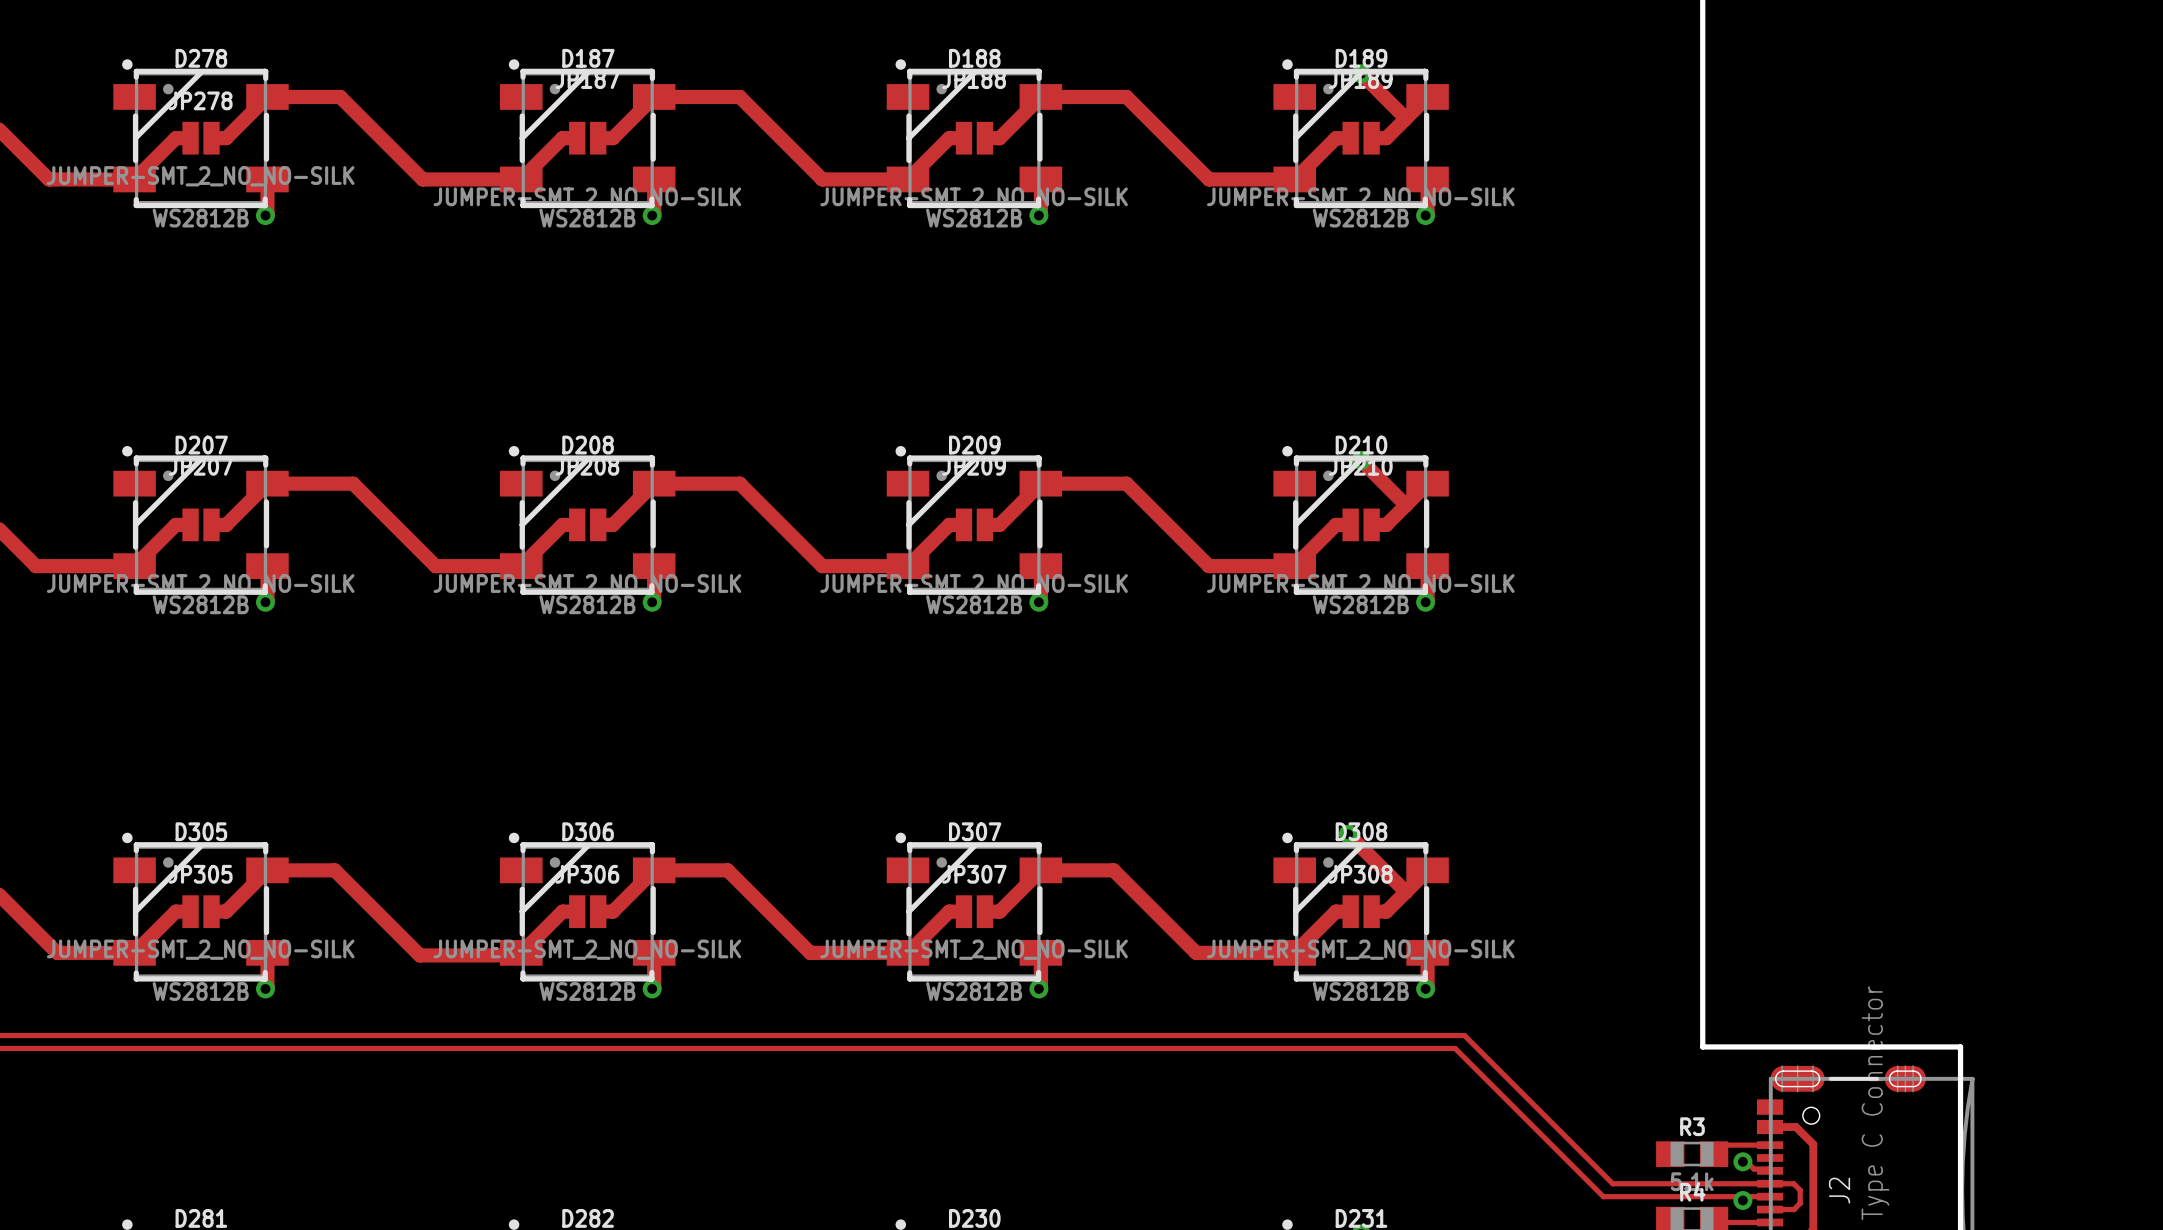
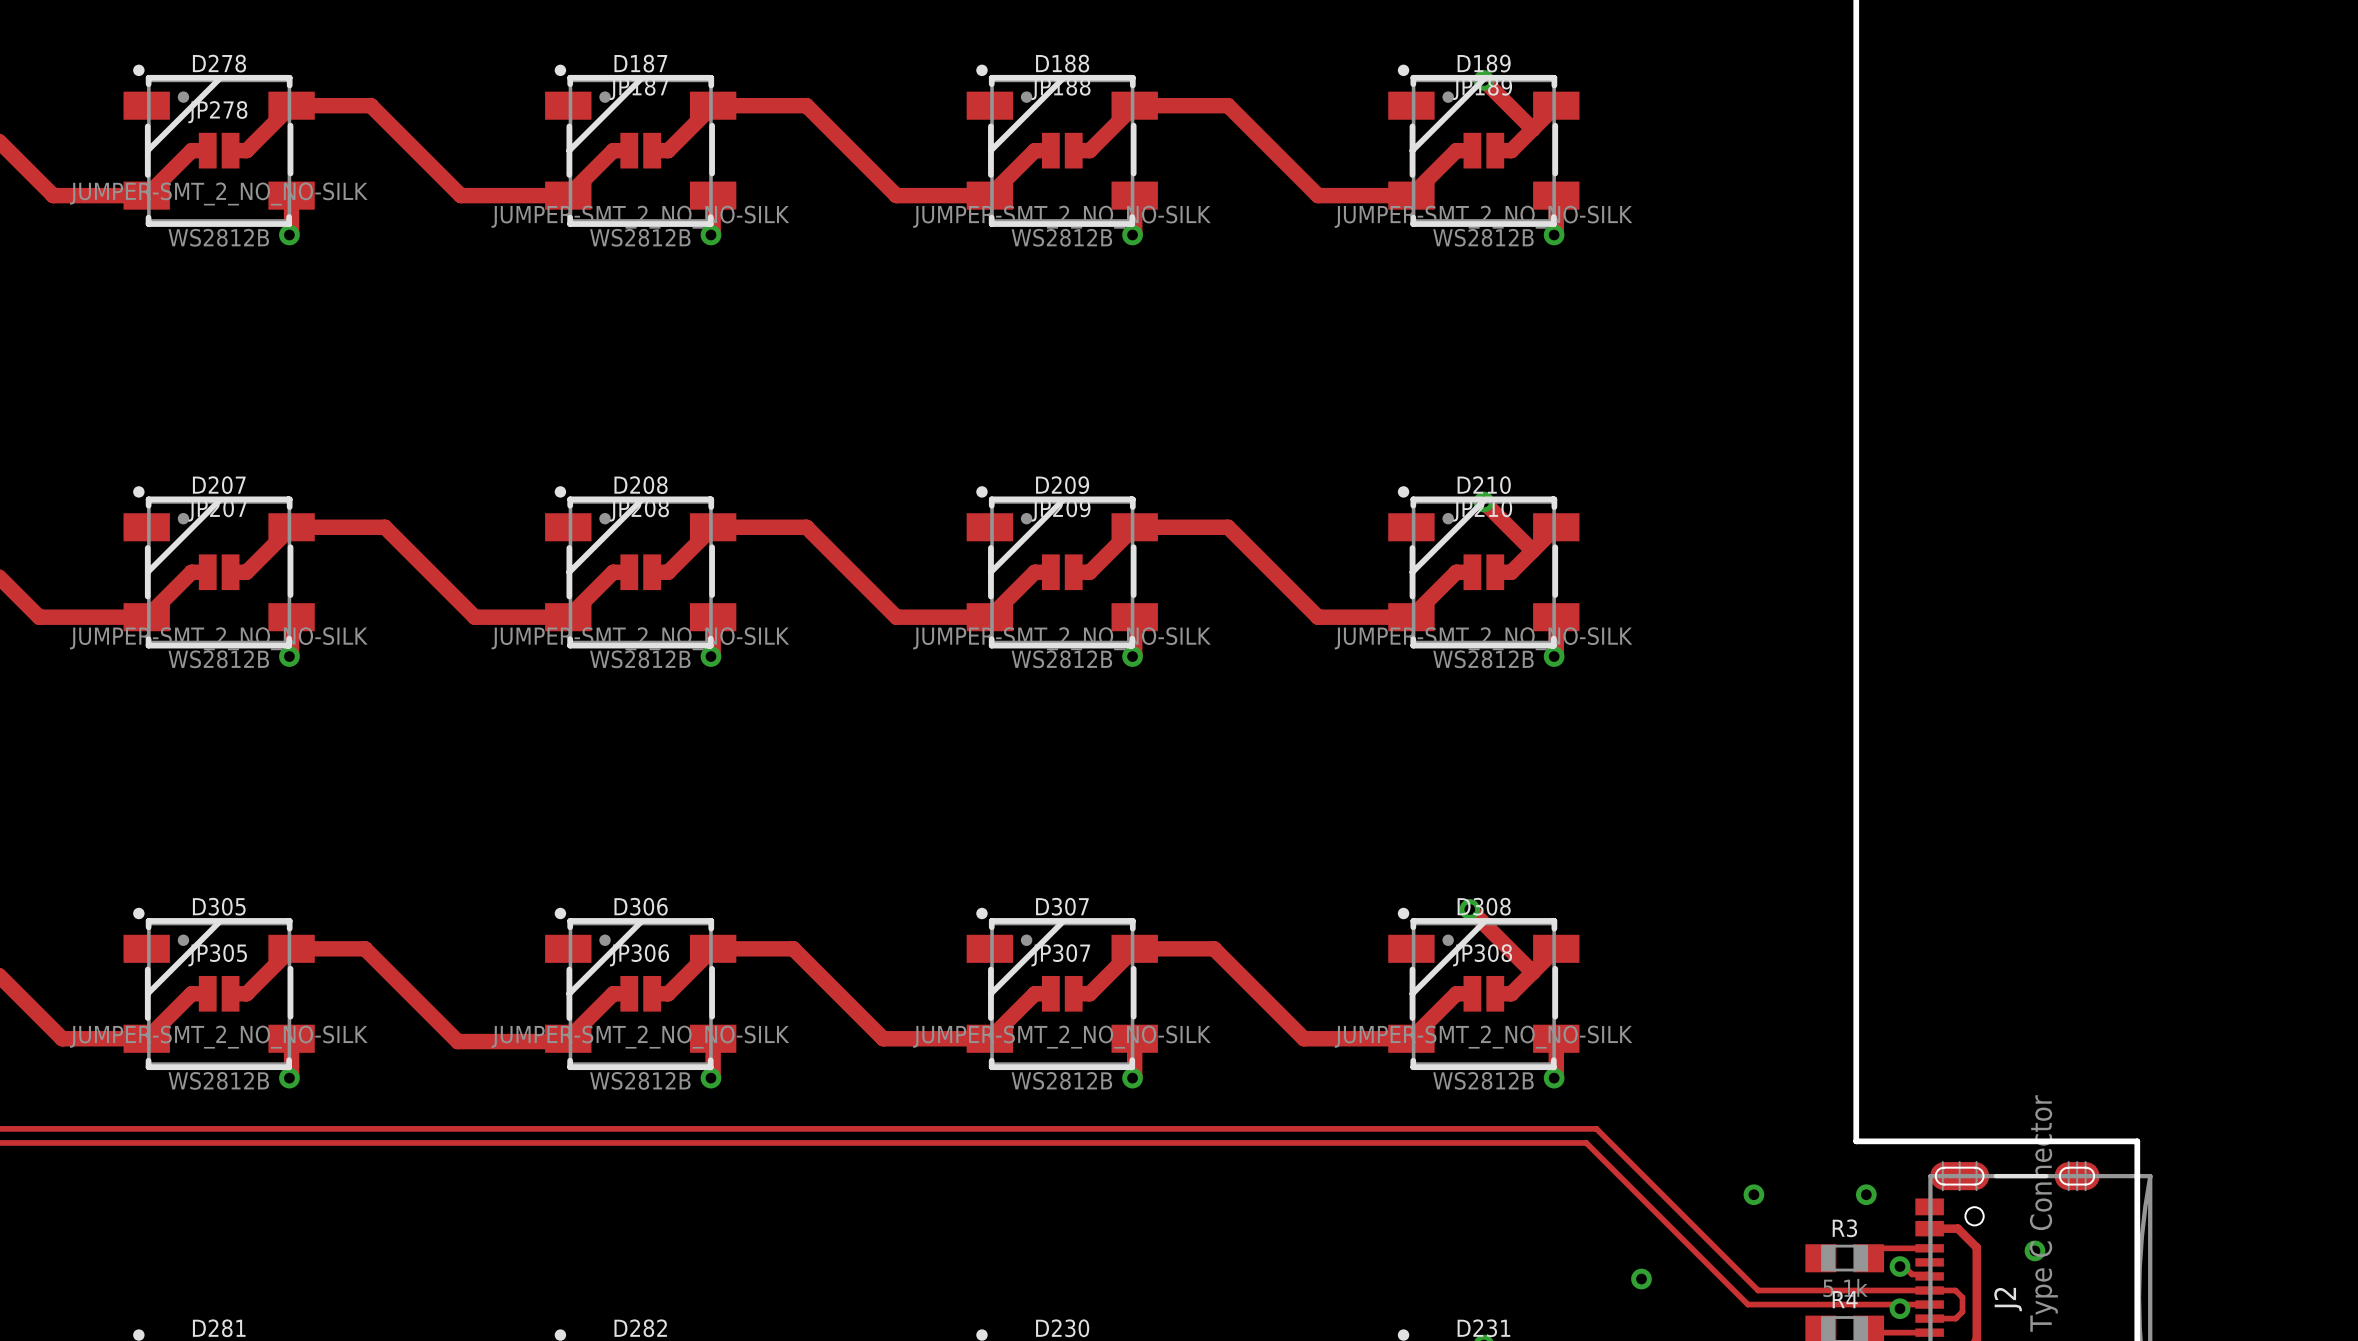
via: none -> (1753, 1194)
via: none -> (1866, 1194)
via: none -> (2034, 1250)
via: none -> (1641, 1279)

